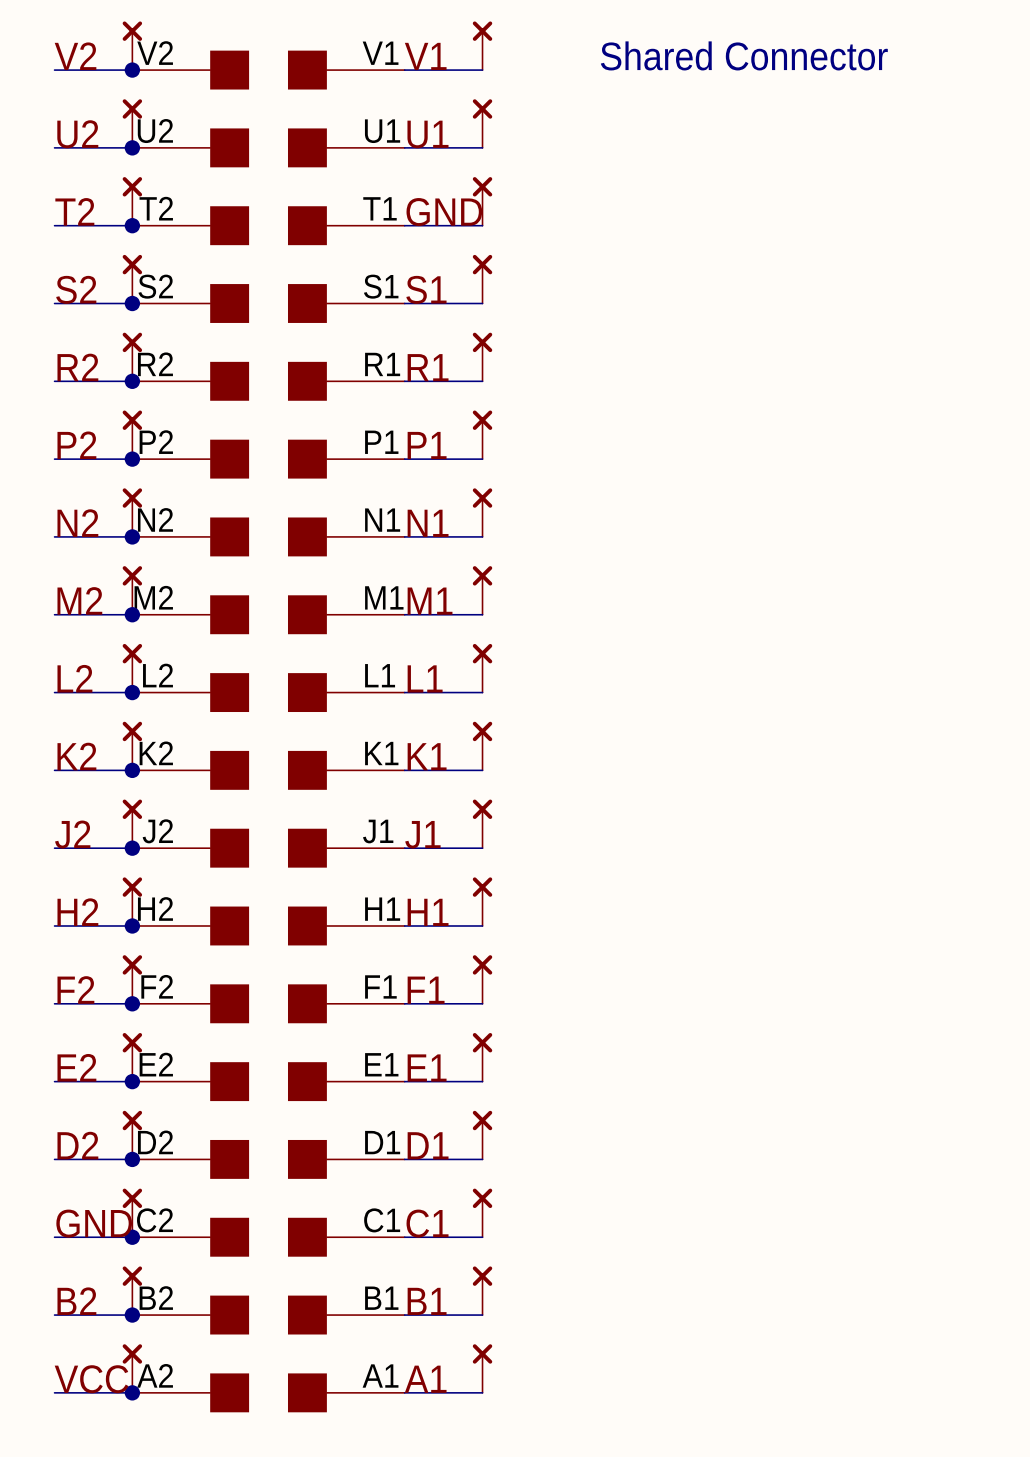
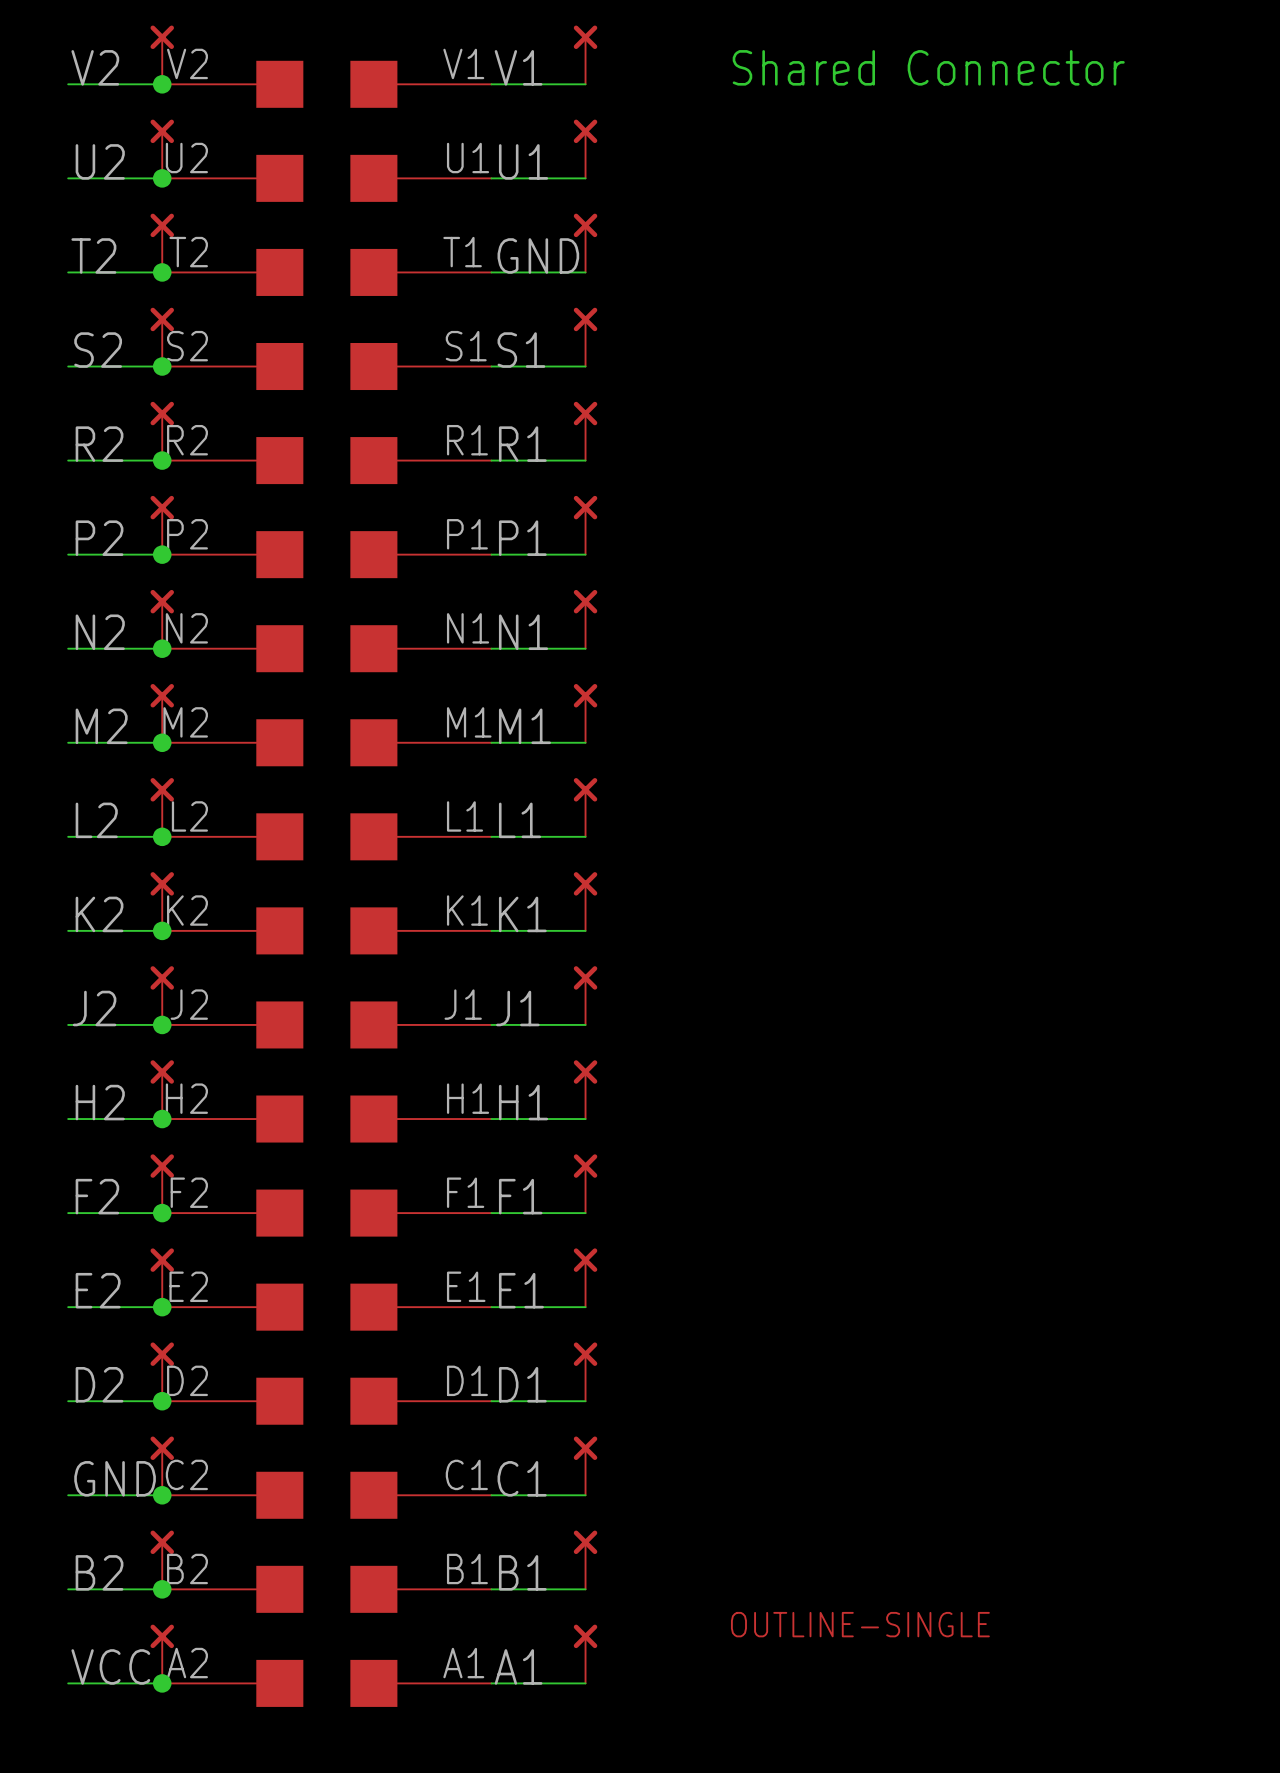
part: none -> OUTLINE-SINGLE (860, 1624)

